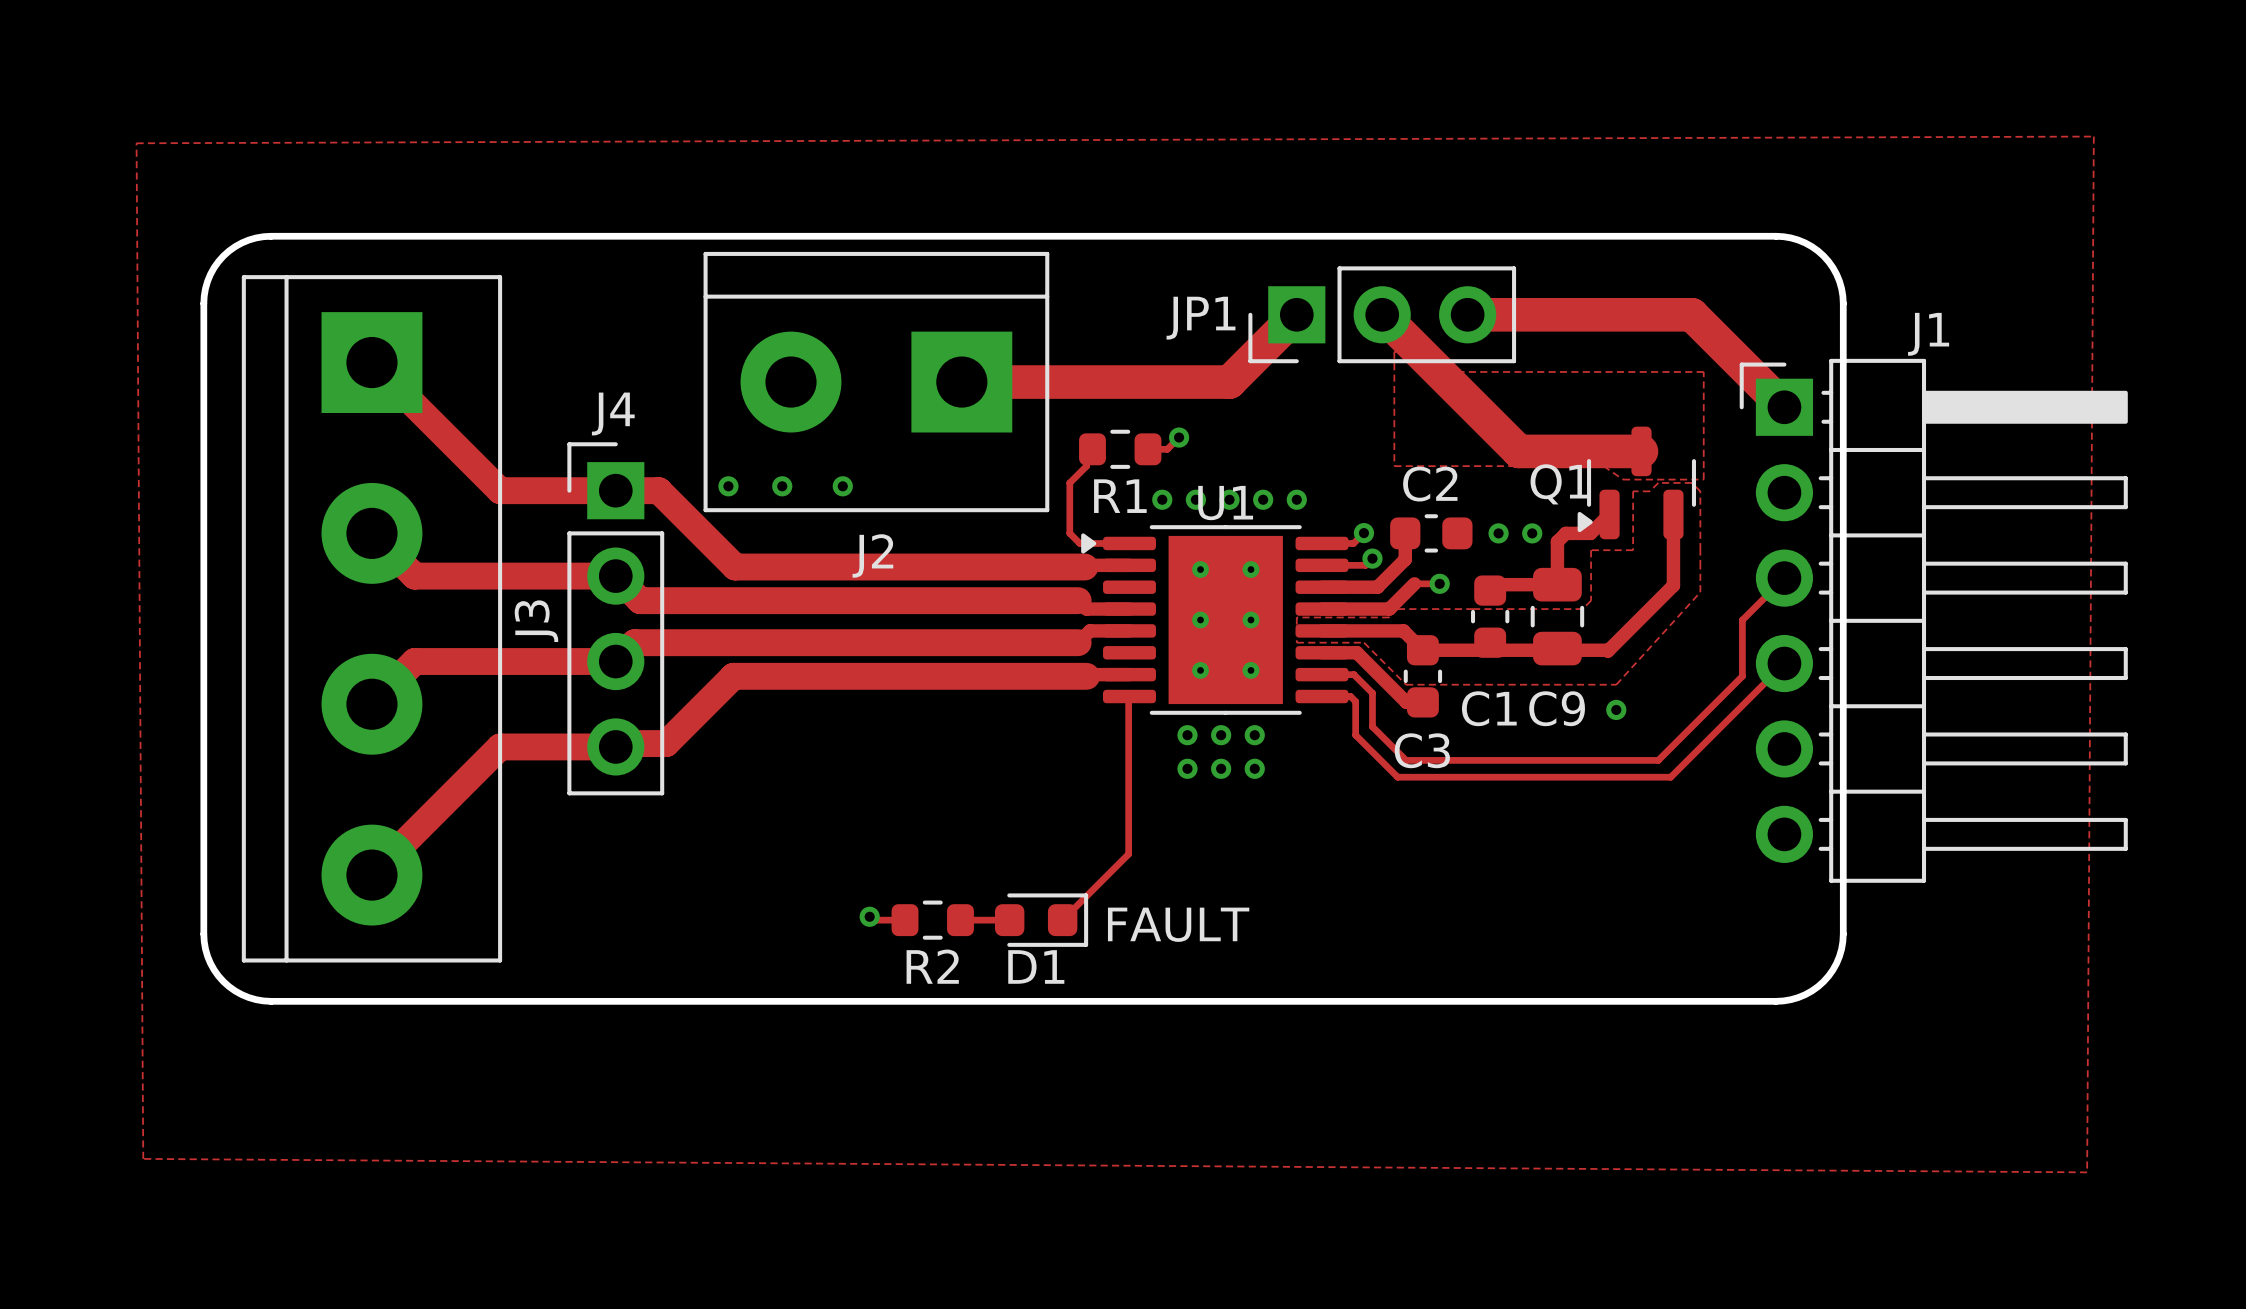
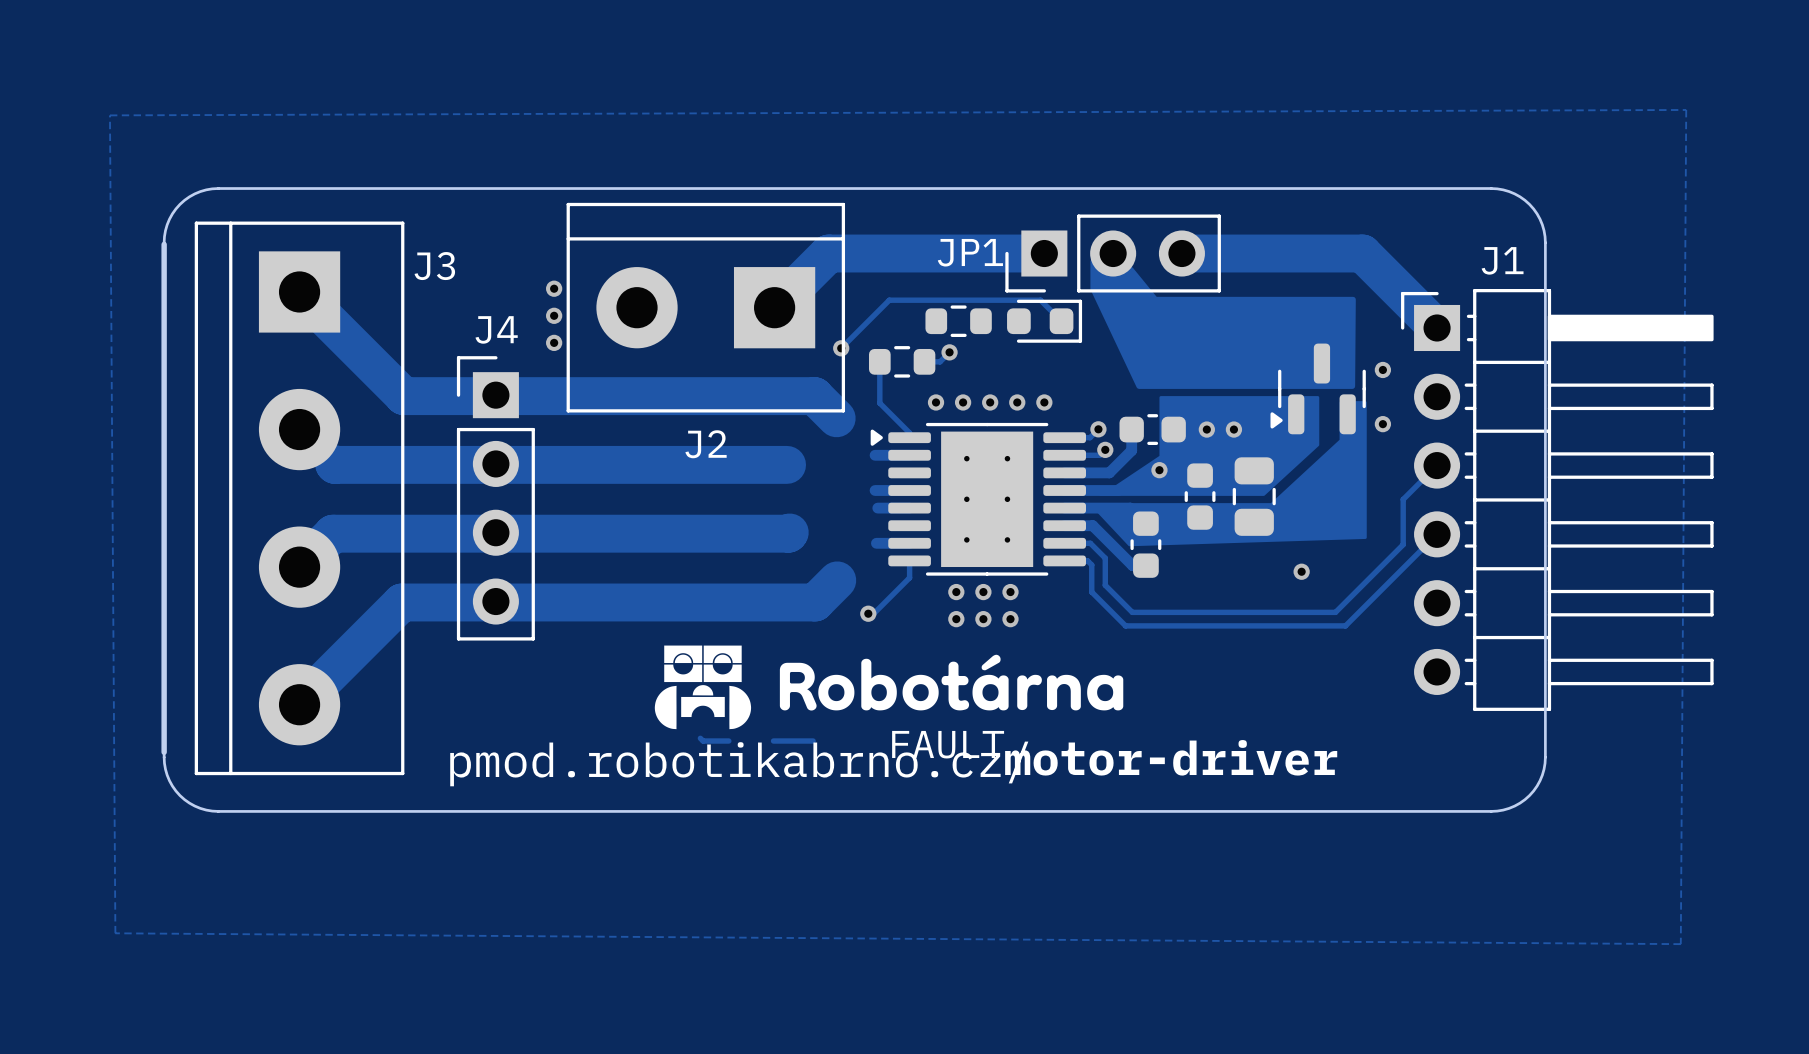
board edge: (203, 303) (205, 288) (210, 274) (223, 255) (241, 242) (256, 237) (271, 236) (1776, 236) (1791, 237) (1805, 242) (1823, 255) (1832, 267) (1839, 281) (1843, 303) (1842, 941) (1836, 963) (1828, 976) (1811, 991) (1798, 997) (1776, 1001) (271, 1001) (248, 997) (235, 991) (223, 981) (210, 963) (205, 949) (203, 934) -> (164, 244) (167, 224) (180, 204) (200, 191) (218, 188) (1491, 188) (1509, 191) (1525, 200) (1533, 208) (1542, 224) (1545, 236) (1545, 757) (1542, 775) (1529, 795) (1509, 808) (1491, 811) (218, 811) (194, 806) (180, 795) (167, 775) (164, 752)
track: (1296, 314) (1229, 382) (961, 382) -> (1044, 253) (828, 253) (774, 307)
track: (1382, 314) (1518, 451) (1641, 451) -> none
track width: thin (1467, 314) (1691, 314) (1784, 407) -> thick (1181, 253) (1362, 253) (1437, 327)
drawing: none -> [1090, 258, 1367, 547]
J1 name position: J1 (1928, 334) -> J1 (1502, 260)
zone outline: (1421, 338) (1454, 371) (1703, 371) (1703, 479) (1623, 479) (1603, 466) (1394, 466) (1394, 351) (1407, 351) (1421, 338) -> none
via: none -> (554, 288)
track width: thin (371, 362) (500, 490) -> thick (299, 291) (402, 395)
via: none -> (554, 315)
part: none -> (958, 321)
part: none -> (1044, 321)
track: none -> (1061, 321) (1040, 300) (889, 300) (841, 348)
via: none -> (554, 342)
via: none -> (841, 348)
track: (1092, 449) (1086, 455) (1086, 466) (1069, 482) (1069, 533) (1079, 543) (1129, 543) -> (879, 361) (879, 403) (909, 432) (909, 437)
via: none -> (1382, 369)
zone outline: (1658, 482) (1691, 482) (1700, 491) (1700, 592) (1616, 684) (1406, 684) (1364, 642) (1296, 642) (1296, 617) (1389, 617) (1397, 609) (1582, 609) (1591, 600) (1591, 550) (1633, 550) (1633, 491) (1649, 491) (1658, 482) -> none
C2 name: C2 (1430, 484) -> none
Q1 name: Q1 (1559, 484) -> none
via: (728, 486) -> none
via: (782, 486) -> none
via: (842, 486) -> none
track: (500, 490) (658, 490) (735, 567) (1084, 567) (1086, 565) -> (402, 395) (814, 396) (836, 418)
R1 name: R1 (1120, 496) -> none
U1 name: U1 (1225, 503) -> none
via: none -> (1382, 424)
track: (414, 576) (615, 576) (640, 600) (1078, 600) (1086, 609) -> (333, 463) (787, 464)
track: (1439, 583) (1414, 583) (1389, 609) -> none
J3 name rotation: 0° (536, 621) -> 90° clockwise (434, 266)
J3 name position: J3 (536, 621) -> J3 (434, 266)
track: (1089, 630) (1078, 642) (634, 642) (615, 661) (413, 662) -> (789, 532) (333, 533)
track: (1088, 674) (1086, 676) (733, 676) (666, 743) (619, 743) (615, 746) (498, 748) -> (837, 580) (815, 602) (401, 602)
track: (1129, 696) (1128, 854) (1062, 920) -> (909, 560) (909, 577) (873, 613) (868, 613)
C1 name: C1 (1489, 708) -> none
C9 name: C9 (1557, 708) -> none
track width: thin (498, 748) (371, 875) -> thick (401, 602) (299, 704)
C3 name: C3 (1422, 750) -> none
via: none -> (868, 613)
drawing: none -> [654, 645, 1124, 730]
via: (869, 916) -> none
R2: (932, 920) -> none
D1: (1041, 920) -> none
text: none -> motor-driver (1171, 757)
text: none -> pmod.robotikabrno.cz/ (739, 763)

